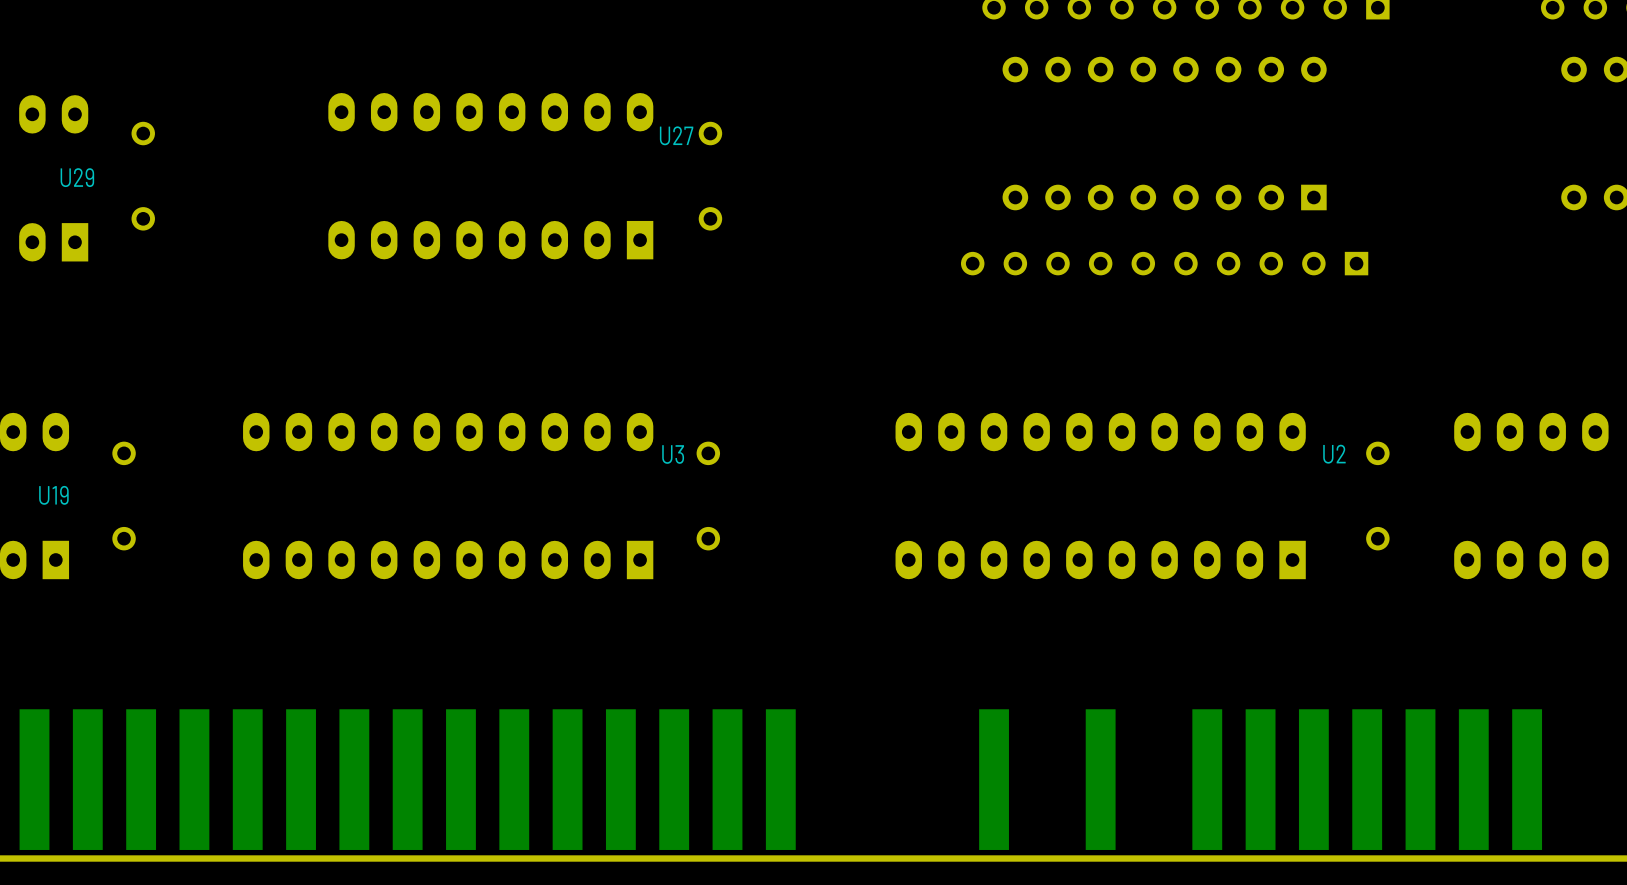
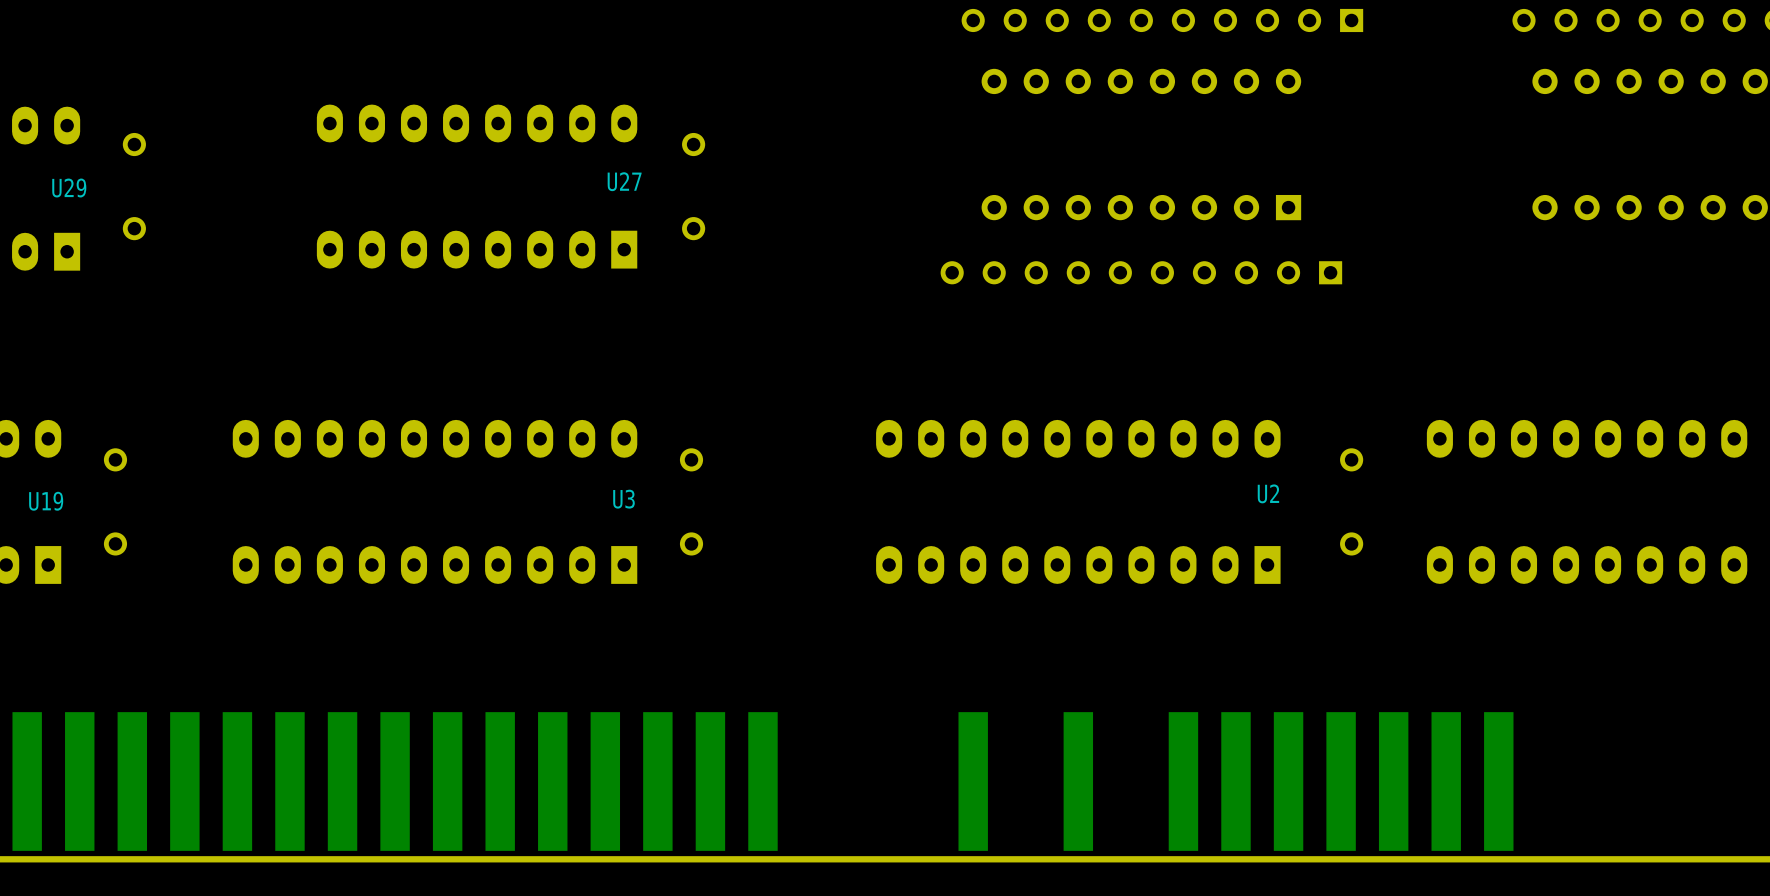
text position: U27 (676, 135) -> U27 (624, 181)
text position: U3 (673, 454) -> U3 (623, 499)
text position: U2 (1334, 454) -> U2 (1268, 493)

